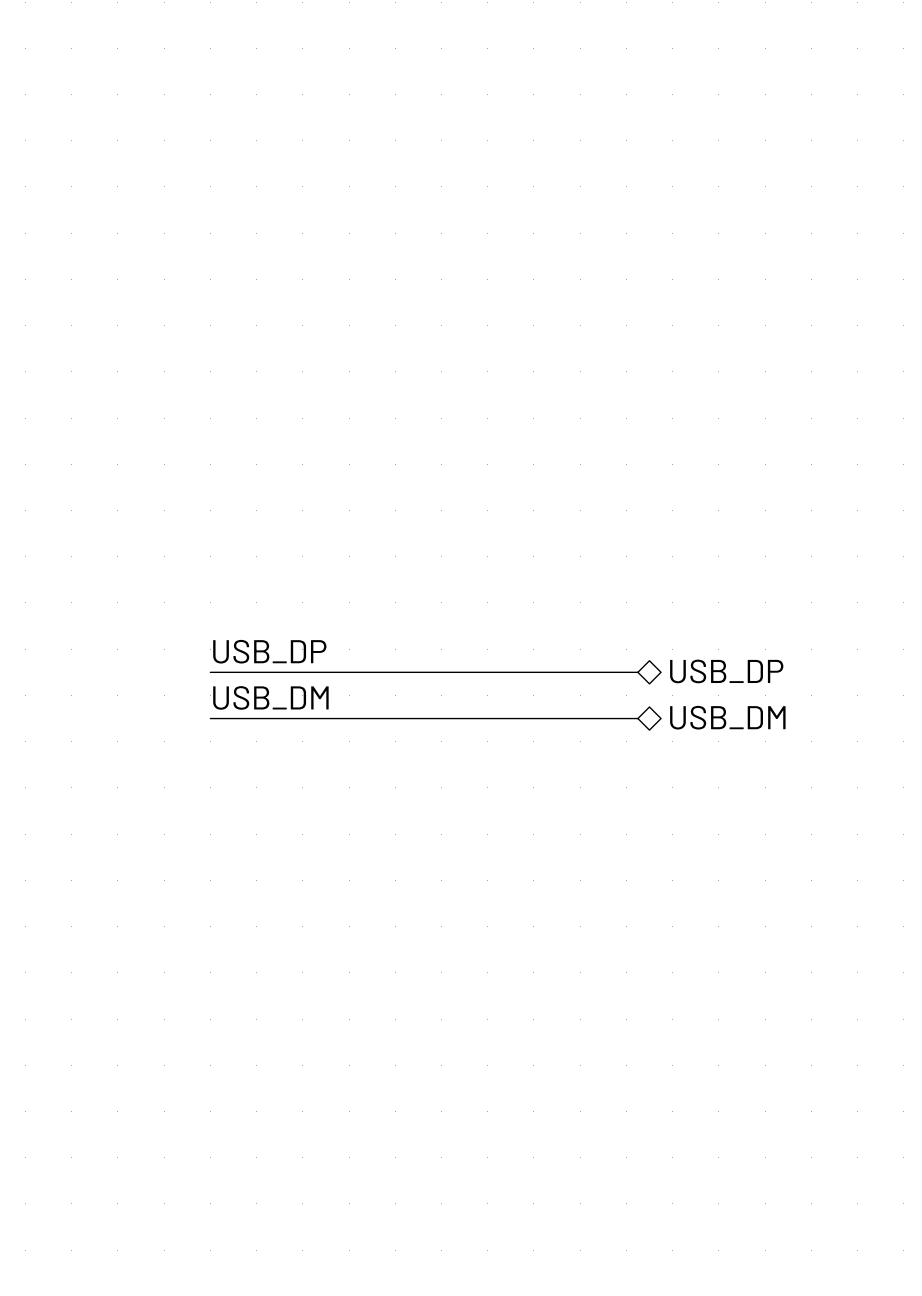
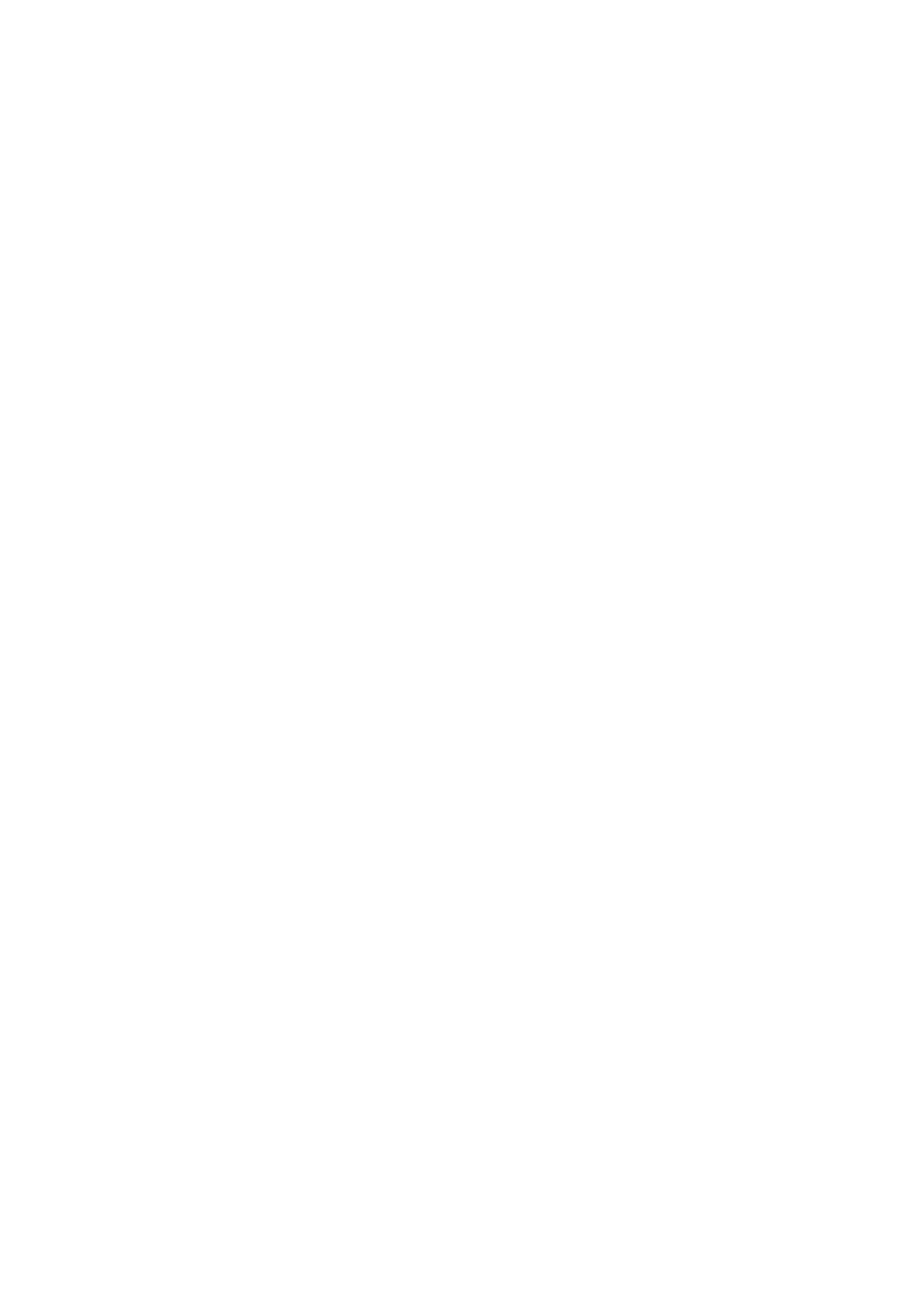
label: USB_DP (269, 651) -> none
hierarchical label: USB_DP (726, 671) -> none
wire: (210, 672) (637, 672) -> none
label: USB_DM (270, 697) -> none
hierarchical label: USB_DM (727, 717) -> none
wire: (210, 718) (637, 718) -> none

